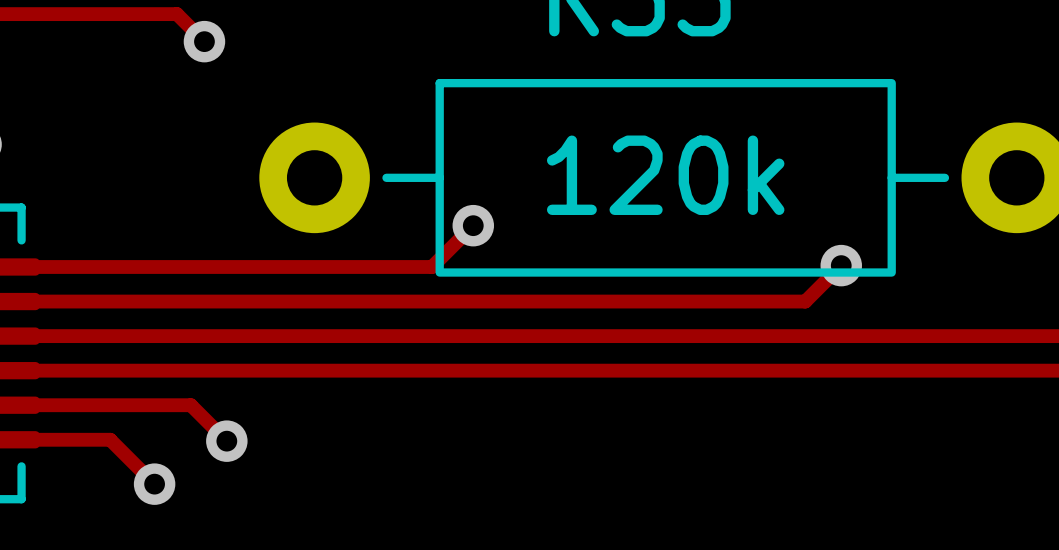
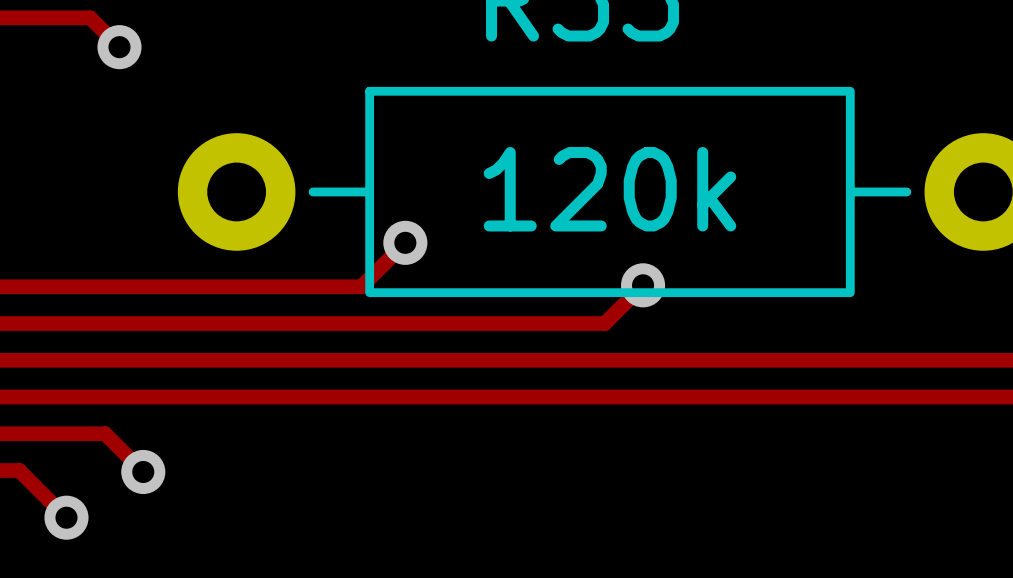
track: (841, 265) (805, 301) (660, 301) -> (643, 285) (604, 323)
via position: (841, 265) -> (643, 285)

